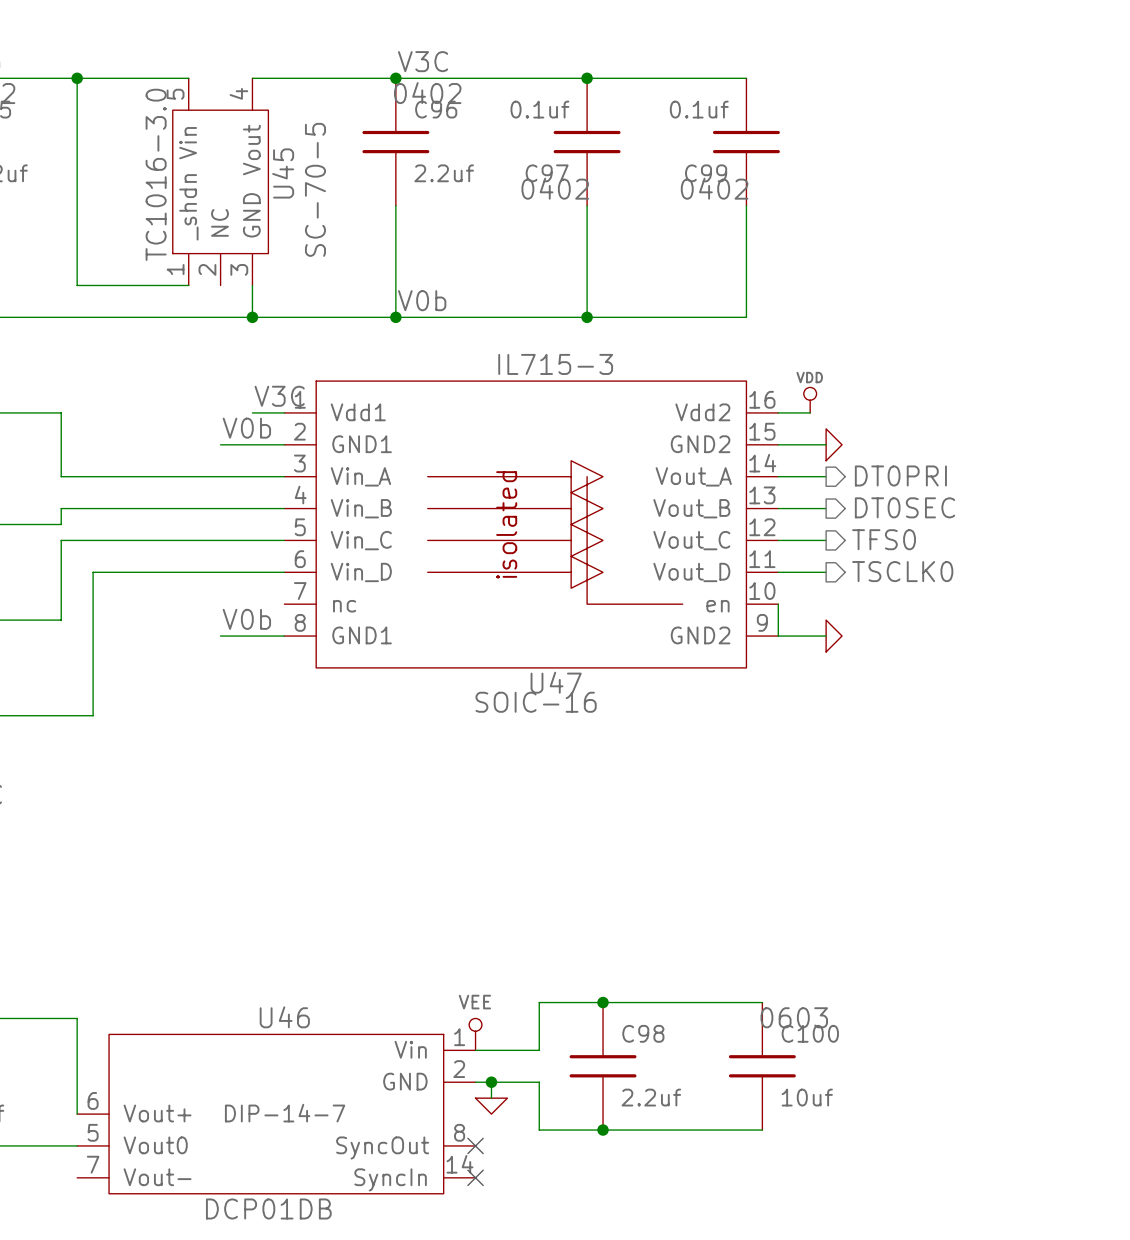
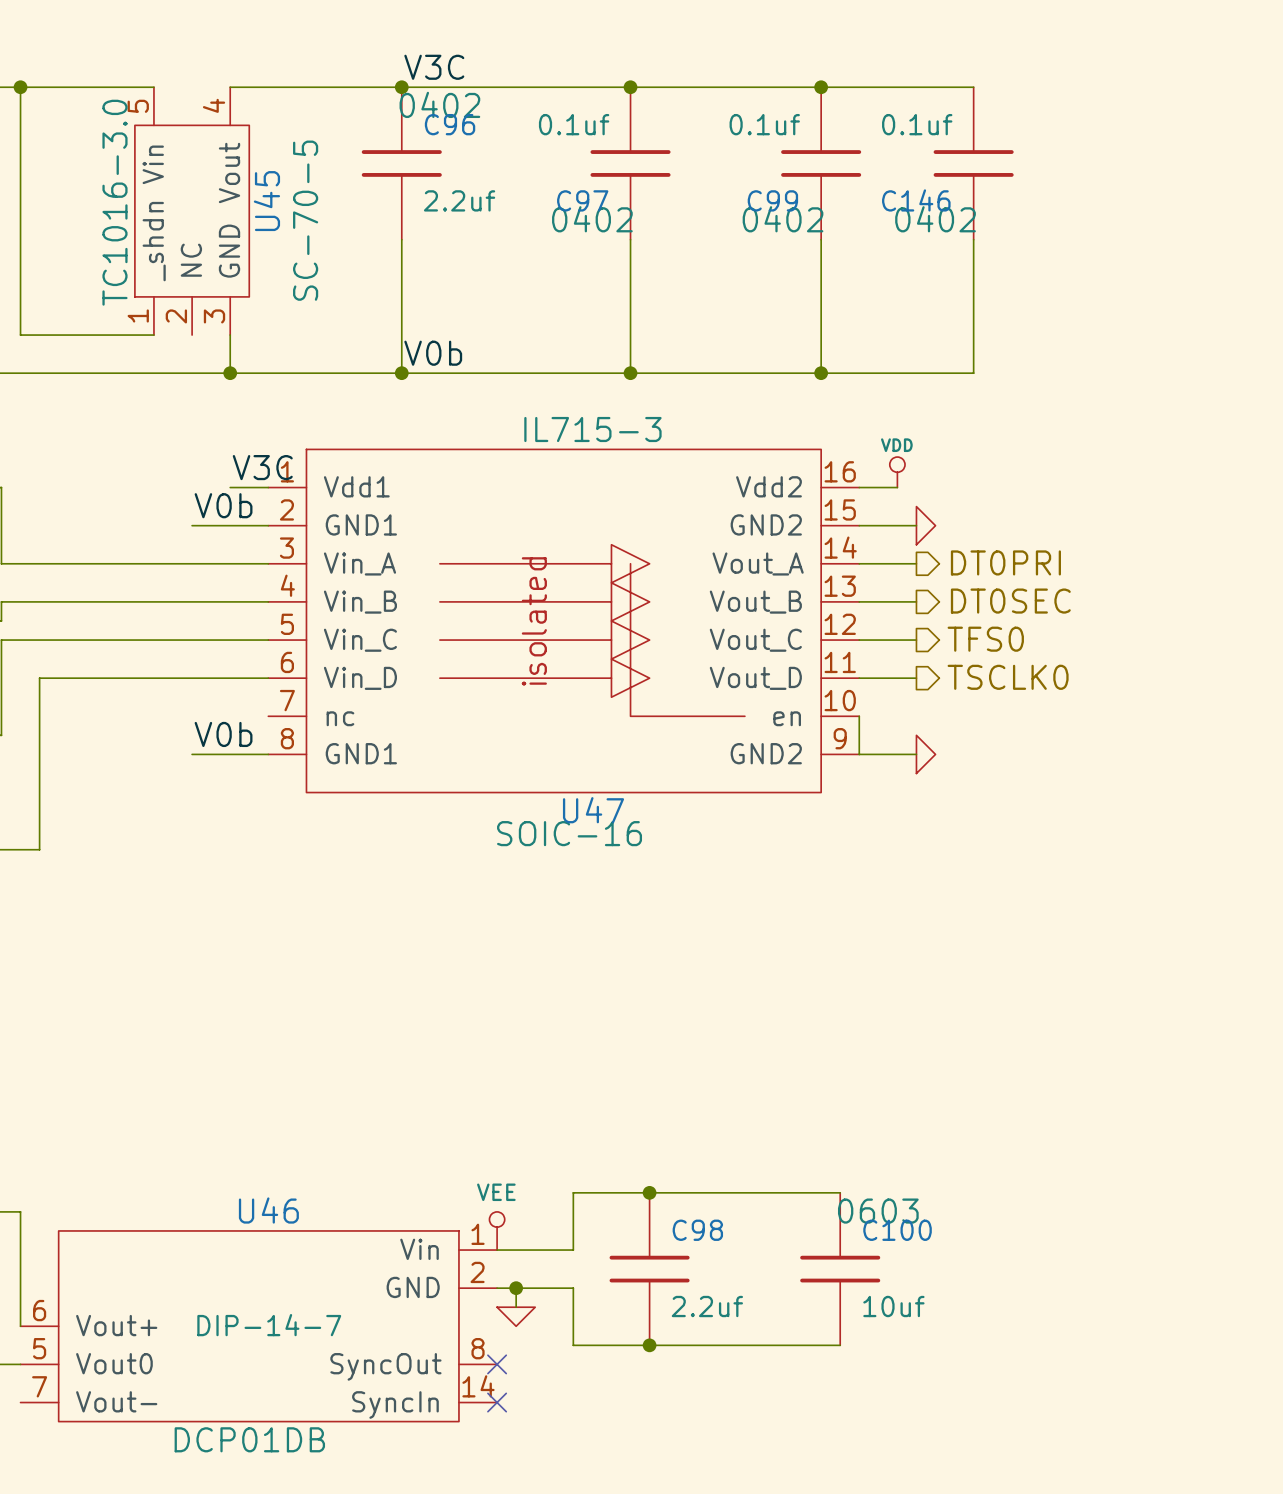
wire: none -> (821, 87) (973, 87)
junction: none -> (821, 87)
C146: none -> 0.1uf (973, 163)
wire: none -> (973, 239) (973, 373) (821, 373)
junction: none -> (821, 373)

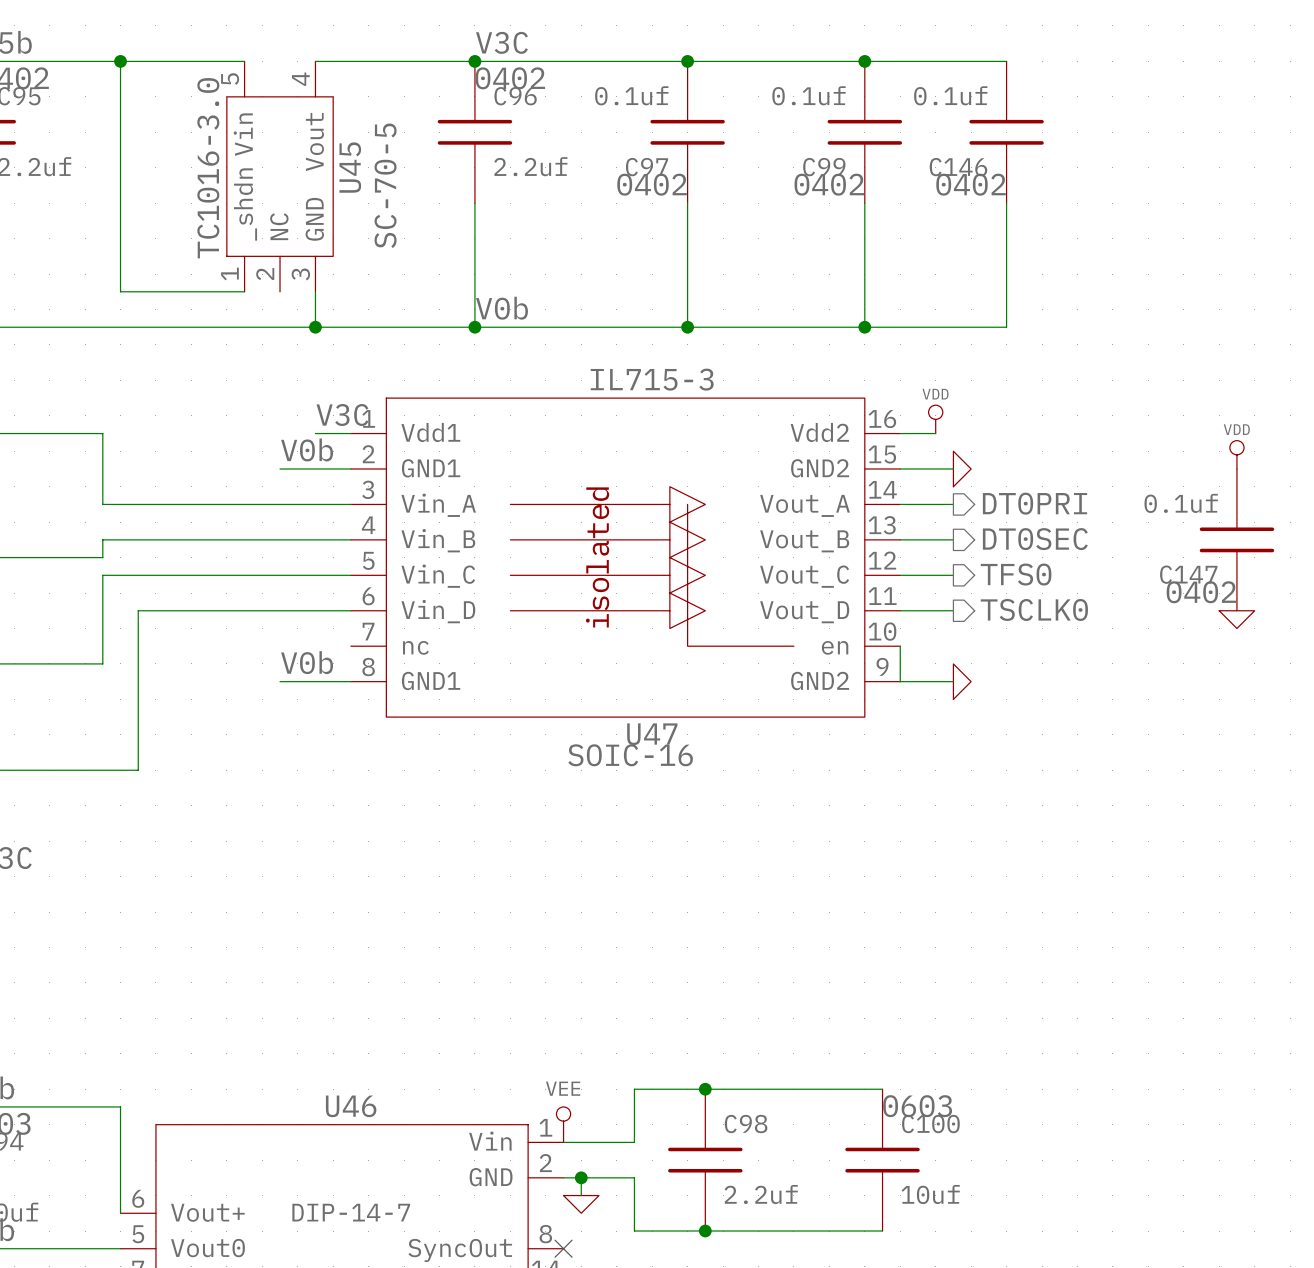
power symbol: none -> VDD (1236, 454)
C147: none -> 0.1uf (1236, 539)
power symbol: none -> (1236, 619)

